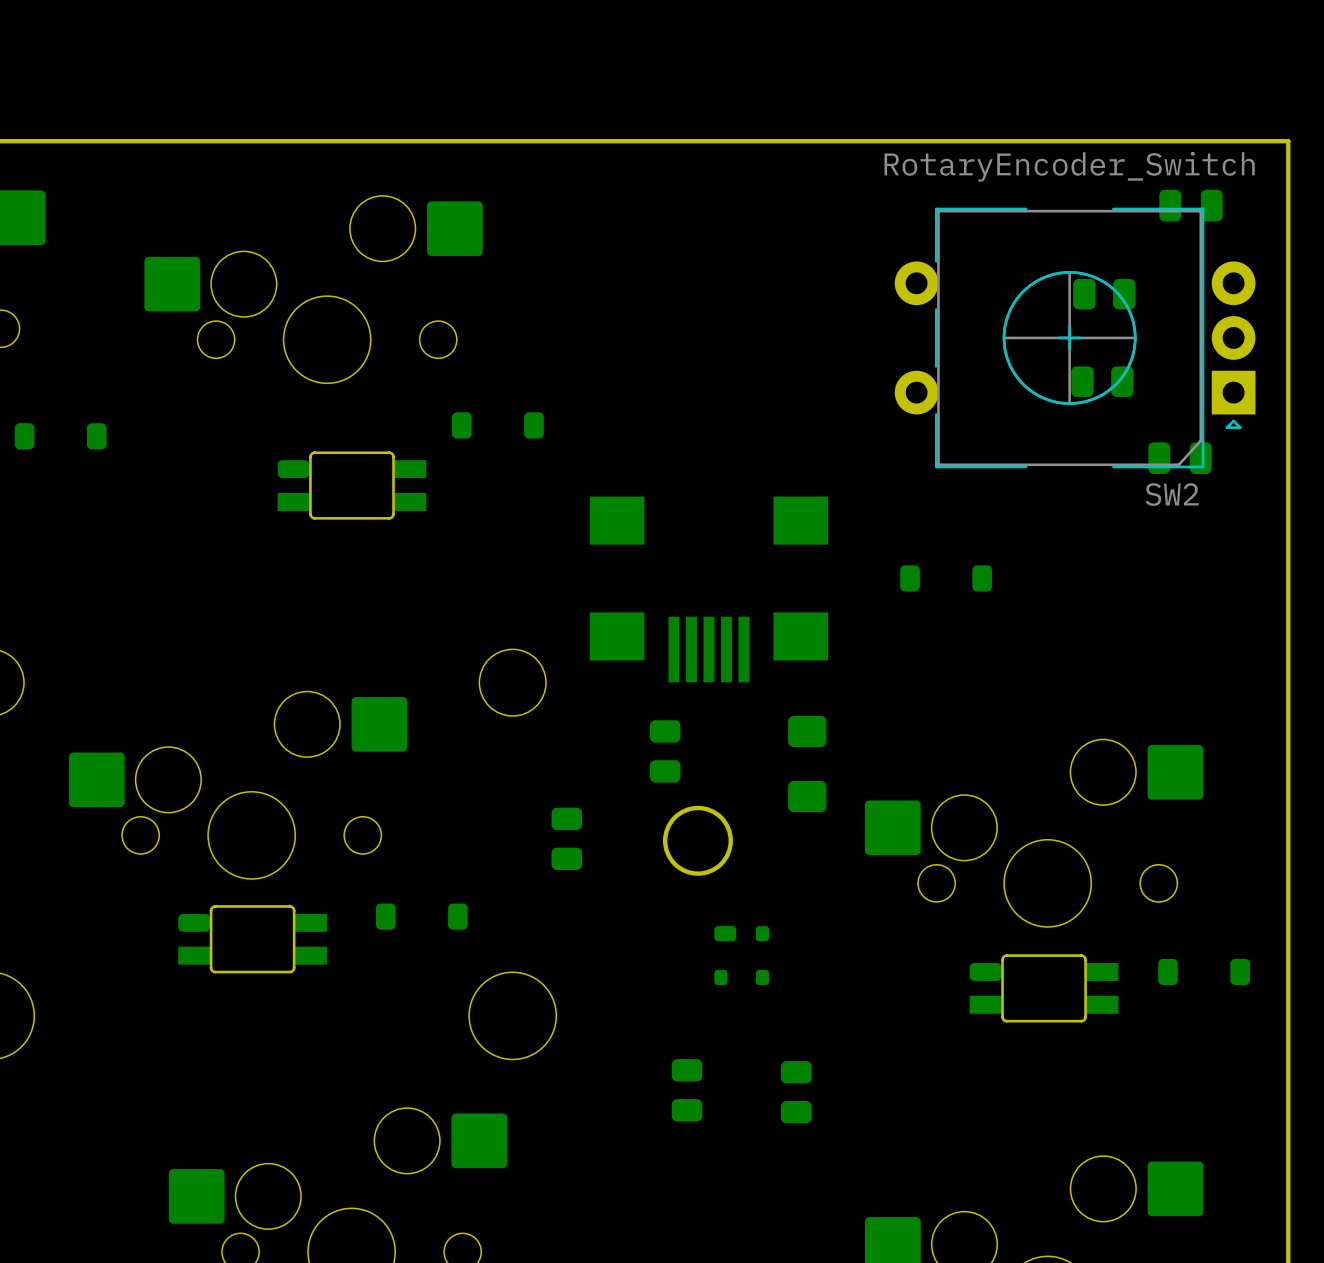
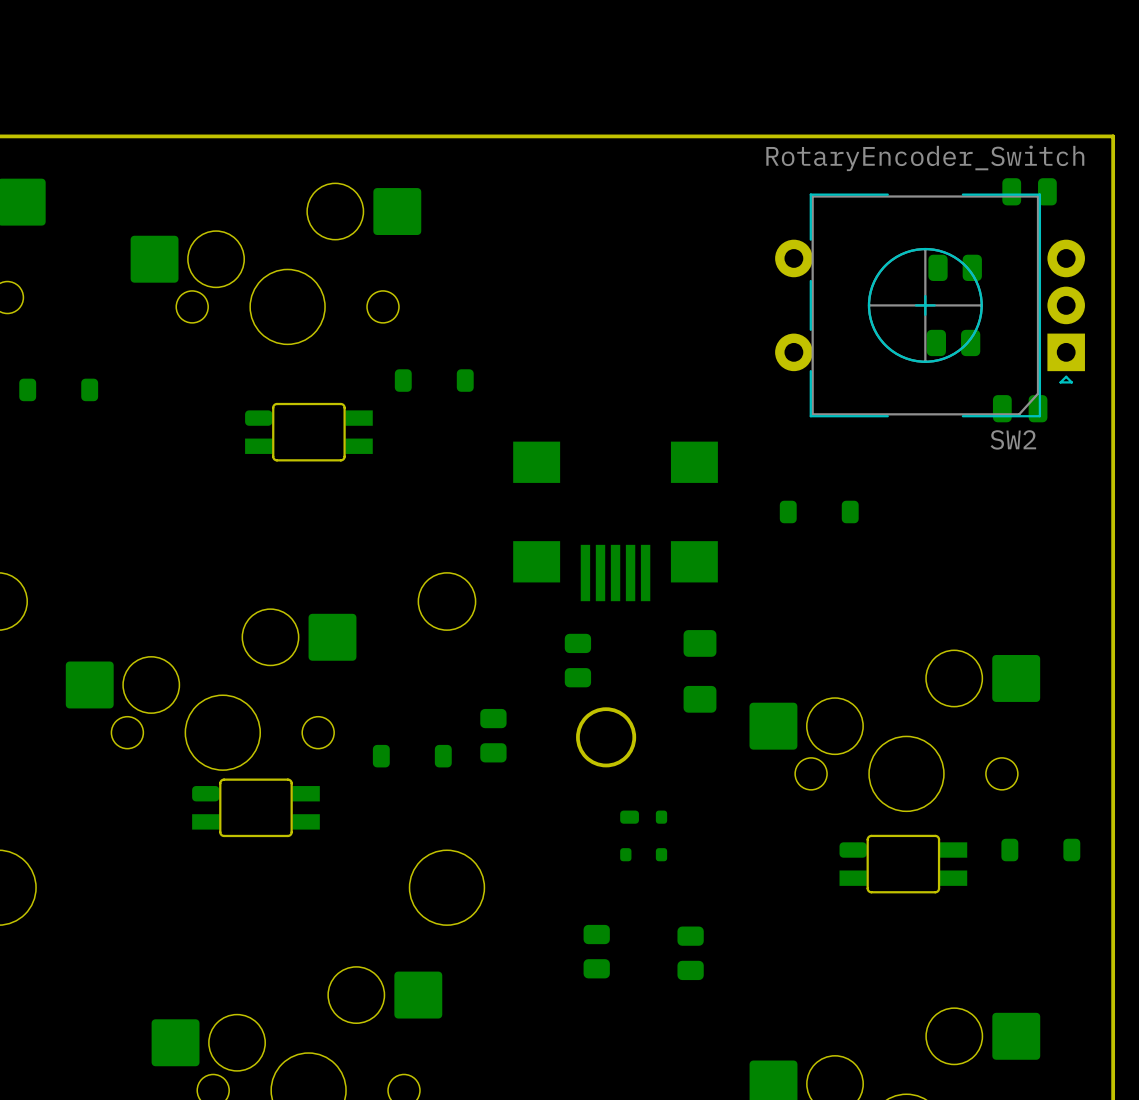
part position: (421, 916) -> (412, 756)
part position: (252, 939) -> (255, 807)

